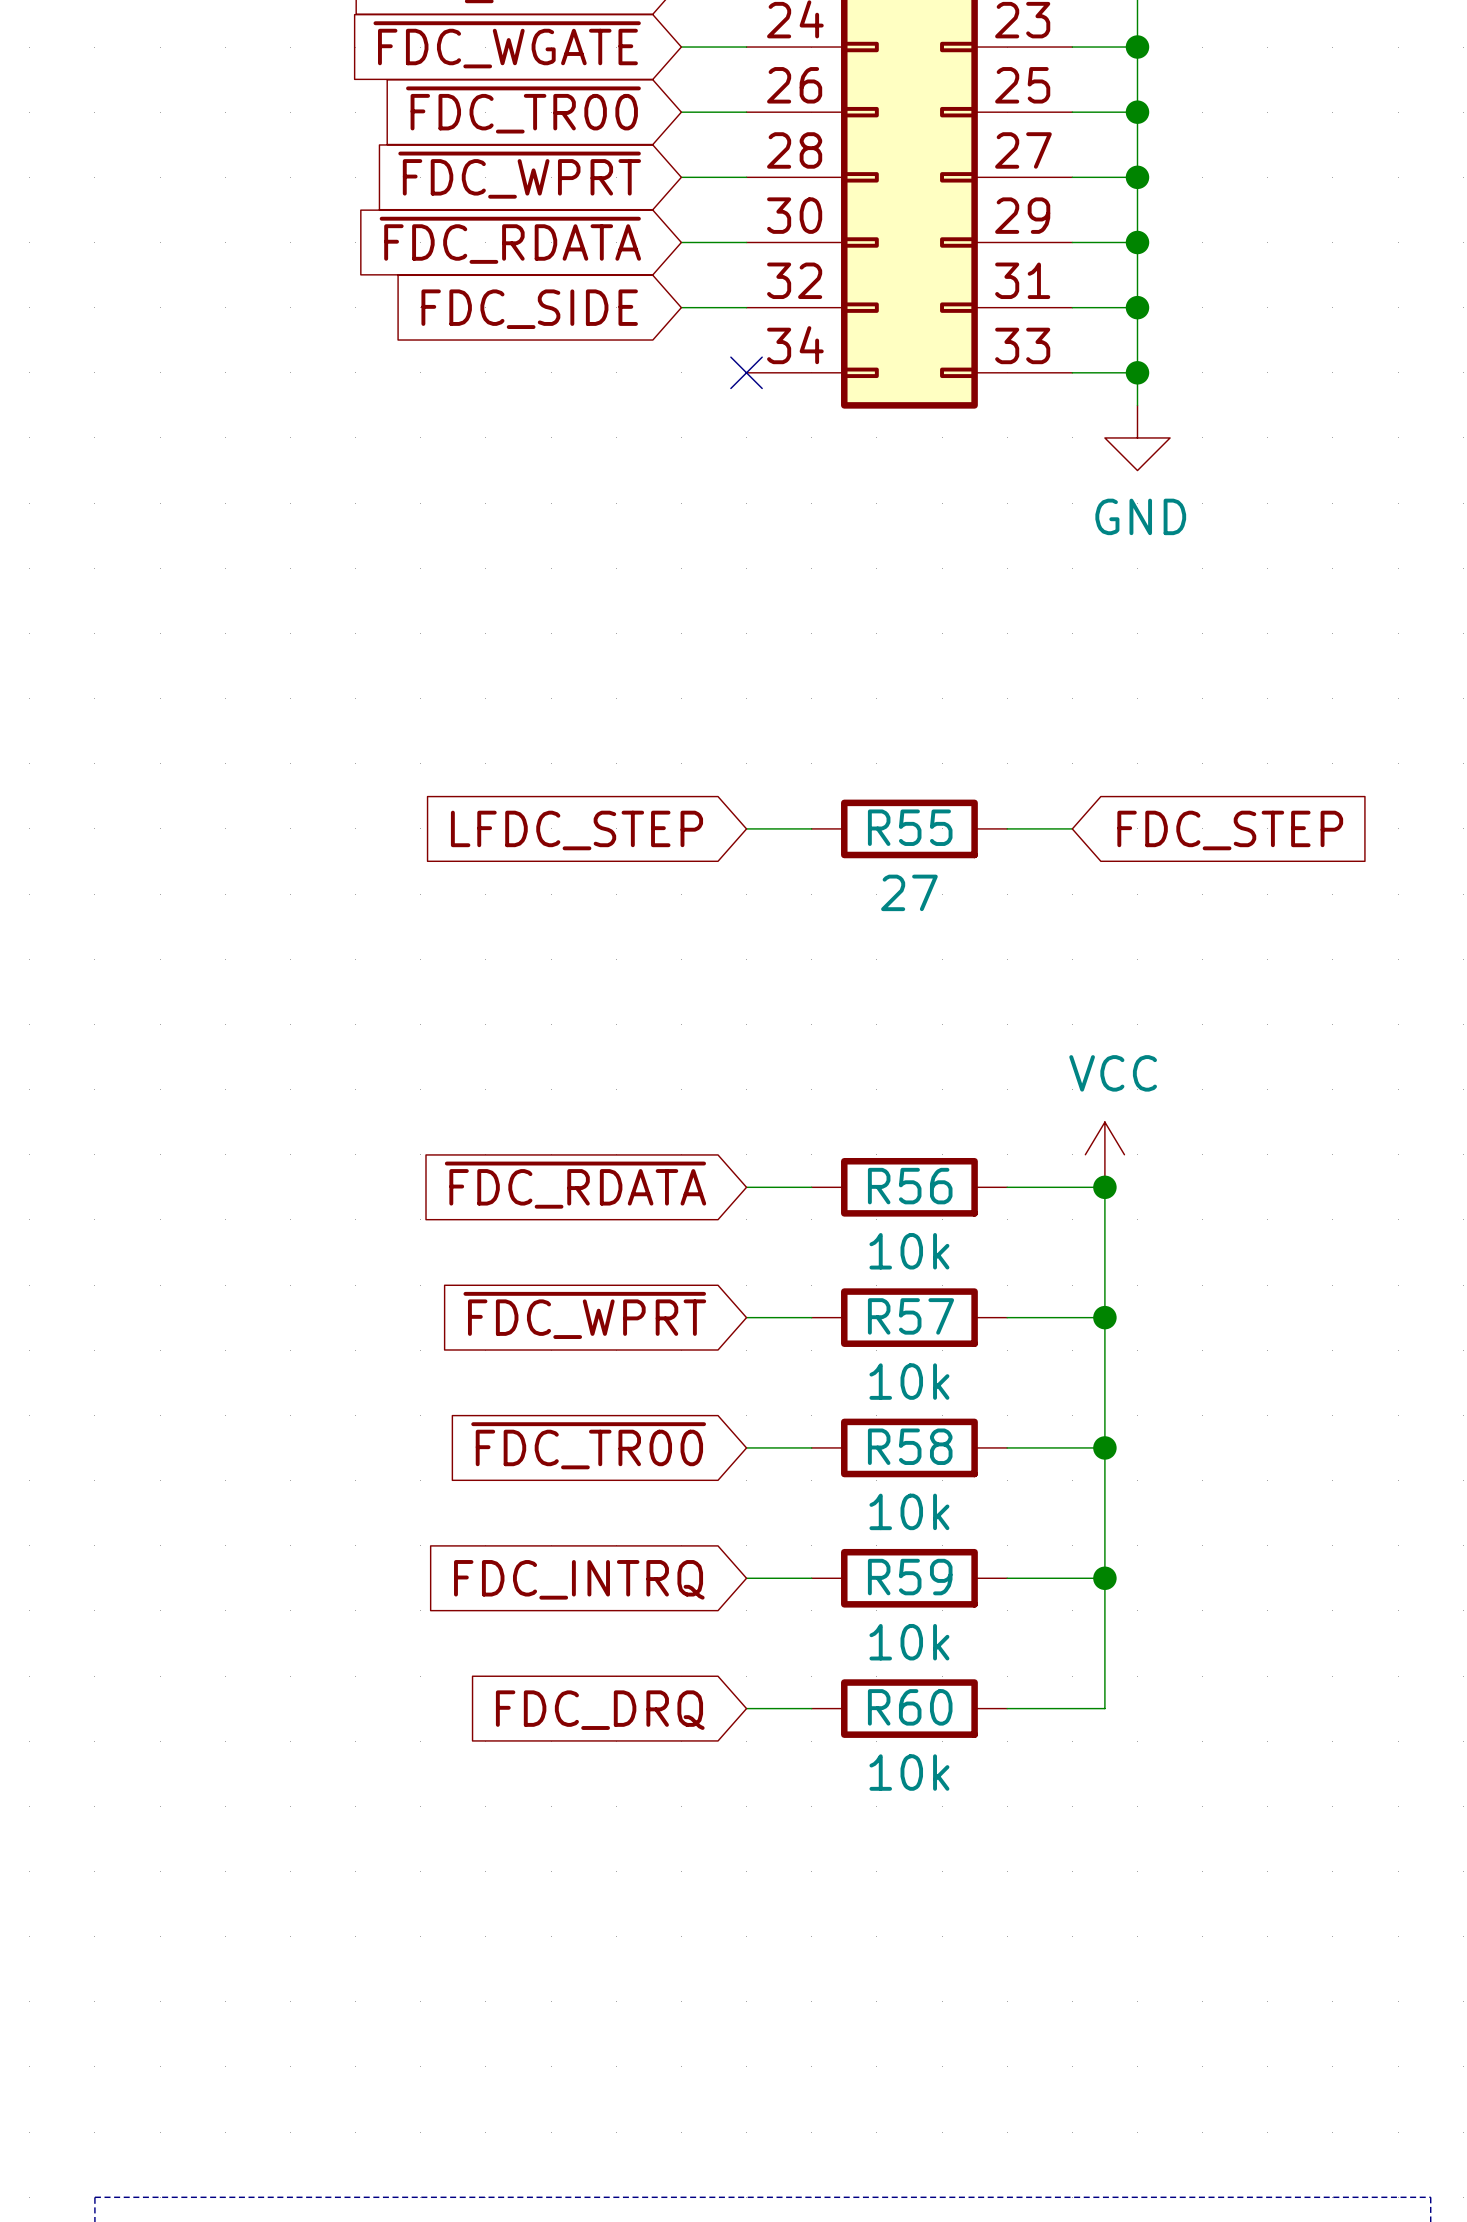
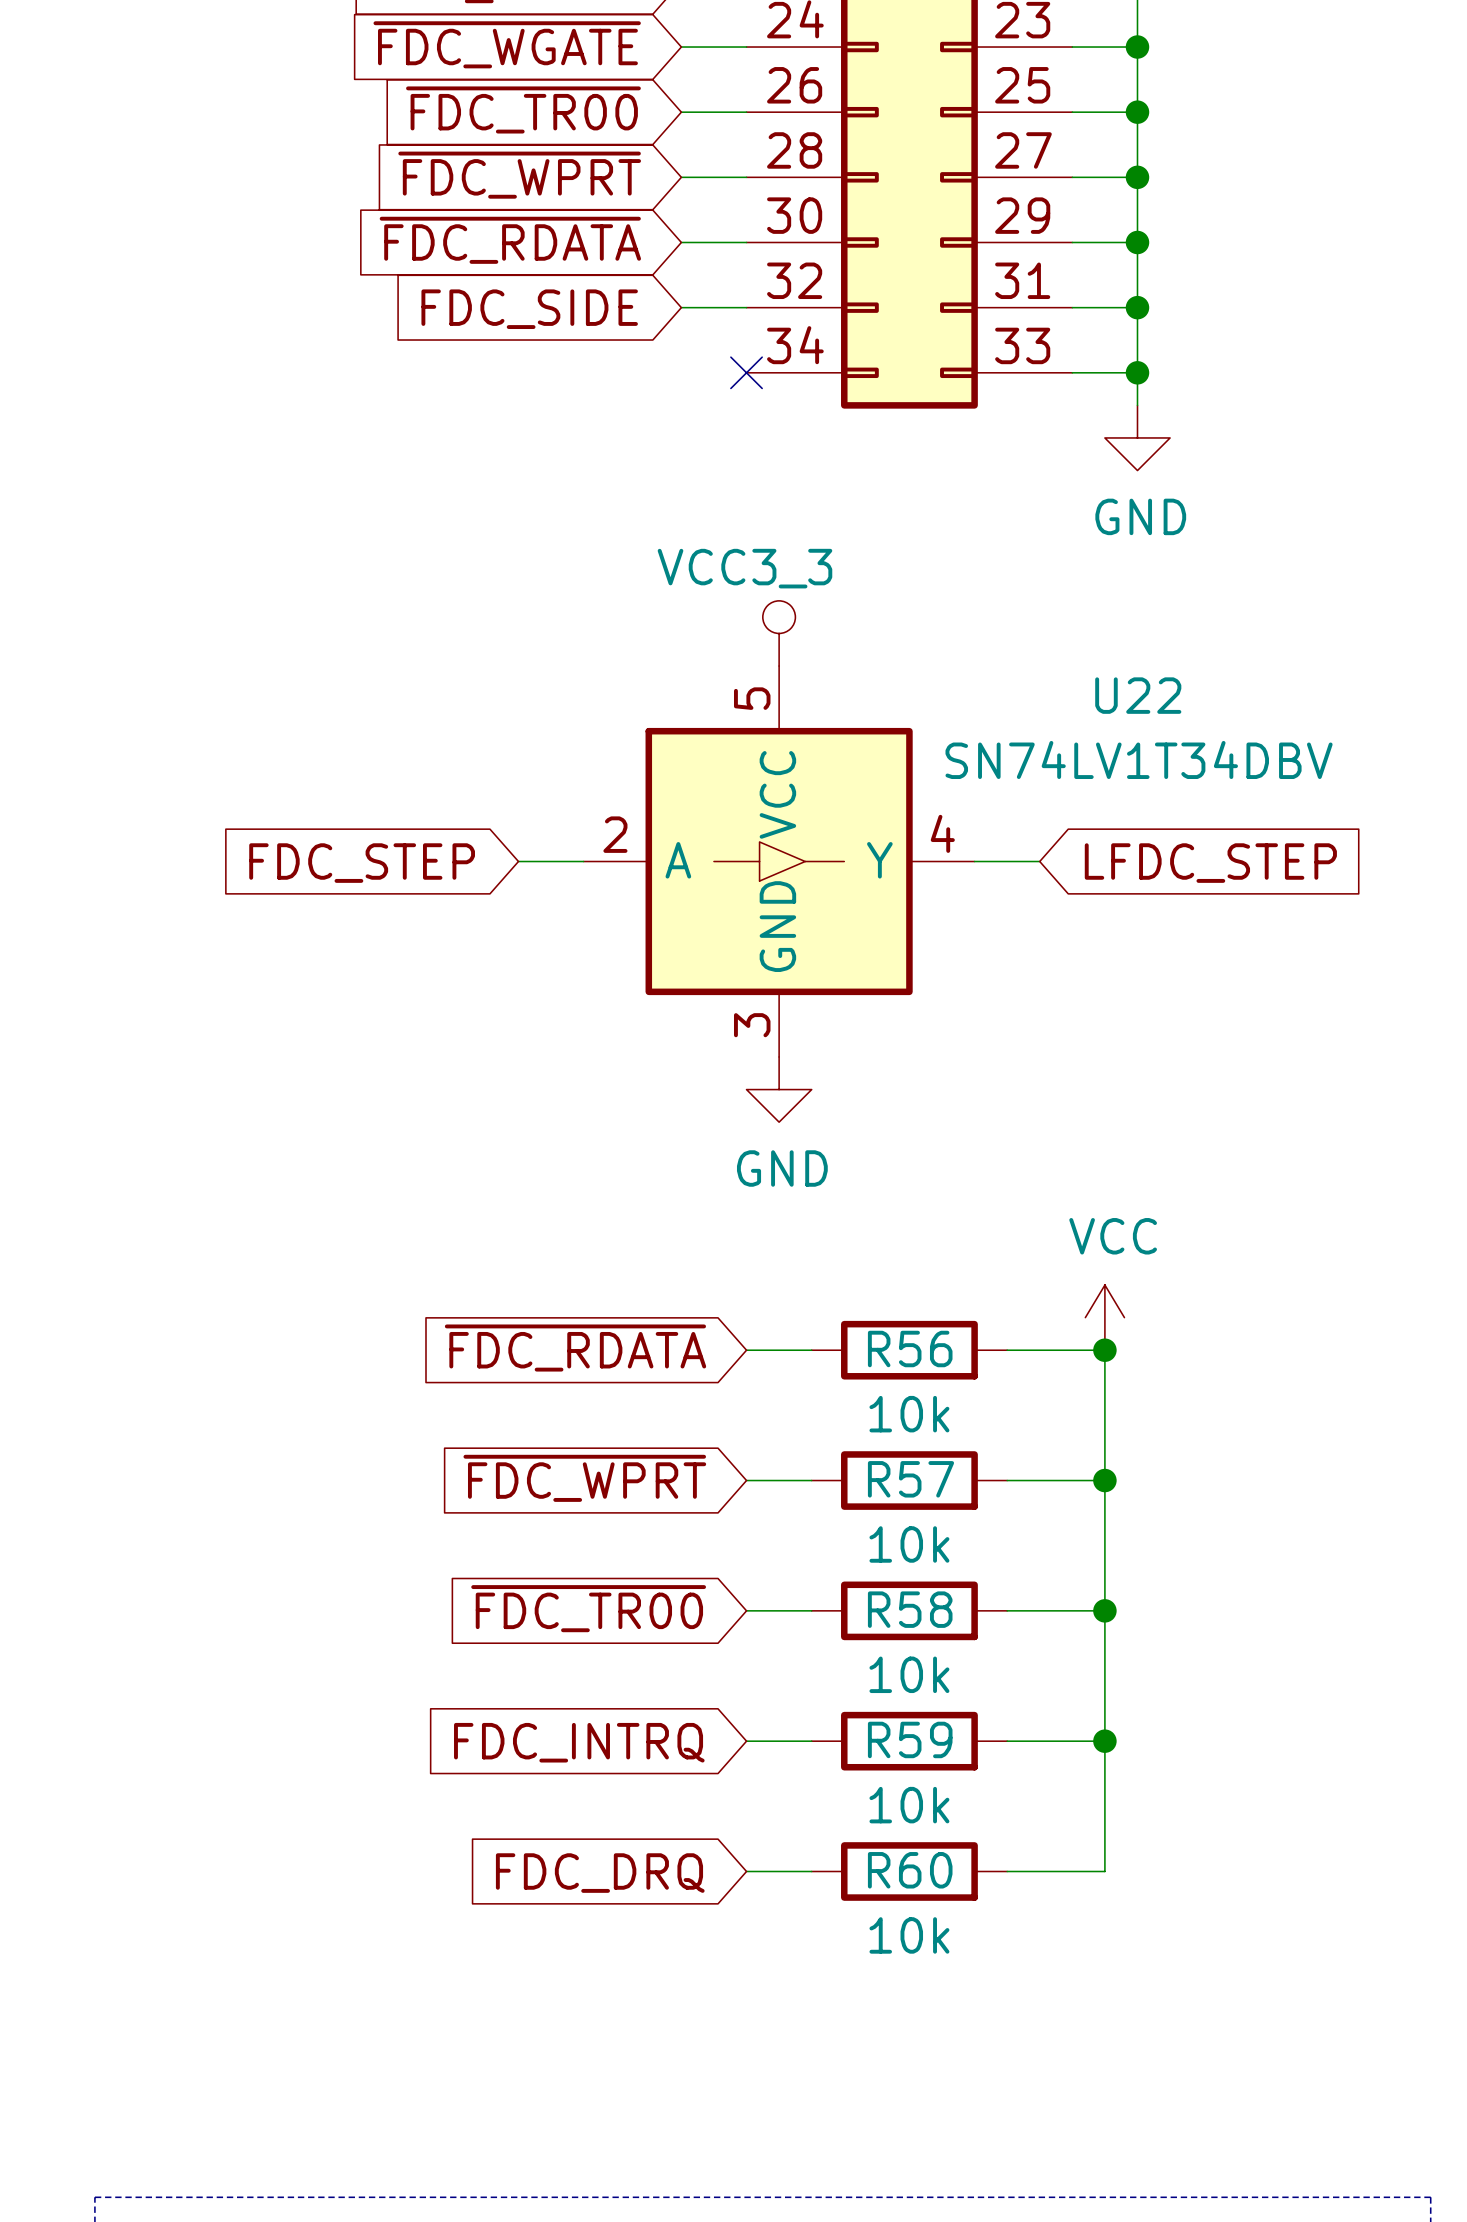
power symbol: none -> VCC3_3 (779, 633)
R55: 27 (909, 828) -> none
wire: (1007, 828) (1072, 828) -> (974, 861) (1039, 861)
global label rotation: 0° (576, 830) -> 180° (1210, 863)
global label position: LFDC_STEP (576, 830) -> LFDC_STEP (1210, 863)
global label rotation: 0° (1230, 830) -> 180° (362, 863)
global label position: FDC_STEP (1230, 830) -> FDC_STEP (362, 863)
U22: none -> SN74LV1T34DBV (779, 861)
power symbol: none -> GND (779, 1089)
power symbol position: VCC (1104, 1154) -> VCC (1104, 1317)
global label position: ~{FDC_RDATA} (575, 1185) -> ~{FDC_RDATA} (575, 1348)
wire: (746, 1187) (811, 1187) -> none
R56 position: (909, 1187) -> (909, 1350)
wire: (1007, 1187) (1104, 1187) (1104, 1350) -> (1007, 1350) (1104, 1350)
junction: (1104, 1187) -> none
global label position: ~{FDC_WPRT} (584, 1315) -> ~{FDC_WPRT} (584, 1478)
wire: (746, 1317) (811, 1317) -> (746, 1350) (811, 1350)
R57 position: (909, 1317) -> (909, 1480)
wire: (1007, 1317) (1104, 1317) -> (1007, 1741) (1104, 1741)
junction position: (1104, 1317) -> (1104, 1350)
global label position: ~{FDC_TR00} (588, 1445) -> ~{FDC_TR00} (588, 1608)
wire: (746, 1447) (811, 1447) -> (746, 1480) (811, 1480)
R58 position: (909, 1447) -> (909, 1610)
wire: (1007, 1447) (1104, 1447) -> (1007, 1480) (1104, 1480)
junction position: (1104, 1447) -> (1104, 1480)
wire: (746, 1578) (811, 1578) -> (746, 1610) (811, 1610)
R59 position: (909, 1578) -> (909, 1741)
wire: (1007, 1578) (1104, 1578) -> (1007, 1610) (1104, 1610)
junction position: (1104, 1578) -> (1104, 1610)
global label position: FDC_INTRQ (579, 1579) -> FDC_INTRQ (579, 1742)
wire: (746, 1708) (811, 1708) -> (746, 1741) (811, 1741)
R60 position: (909, 1708) -> (909, 1871)
wire: (1007, 1708) (1104, 1708) -> (1007, 1871) (1104, 1871) (1104, 1708)
global label position: FDC_DRQ (600, 1710) -> FDC_DRQ (600, 1873)
junction: none -> (1104, 1741)
wire: none -> (746, 1871) (811, 1871)

